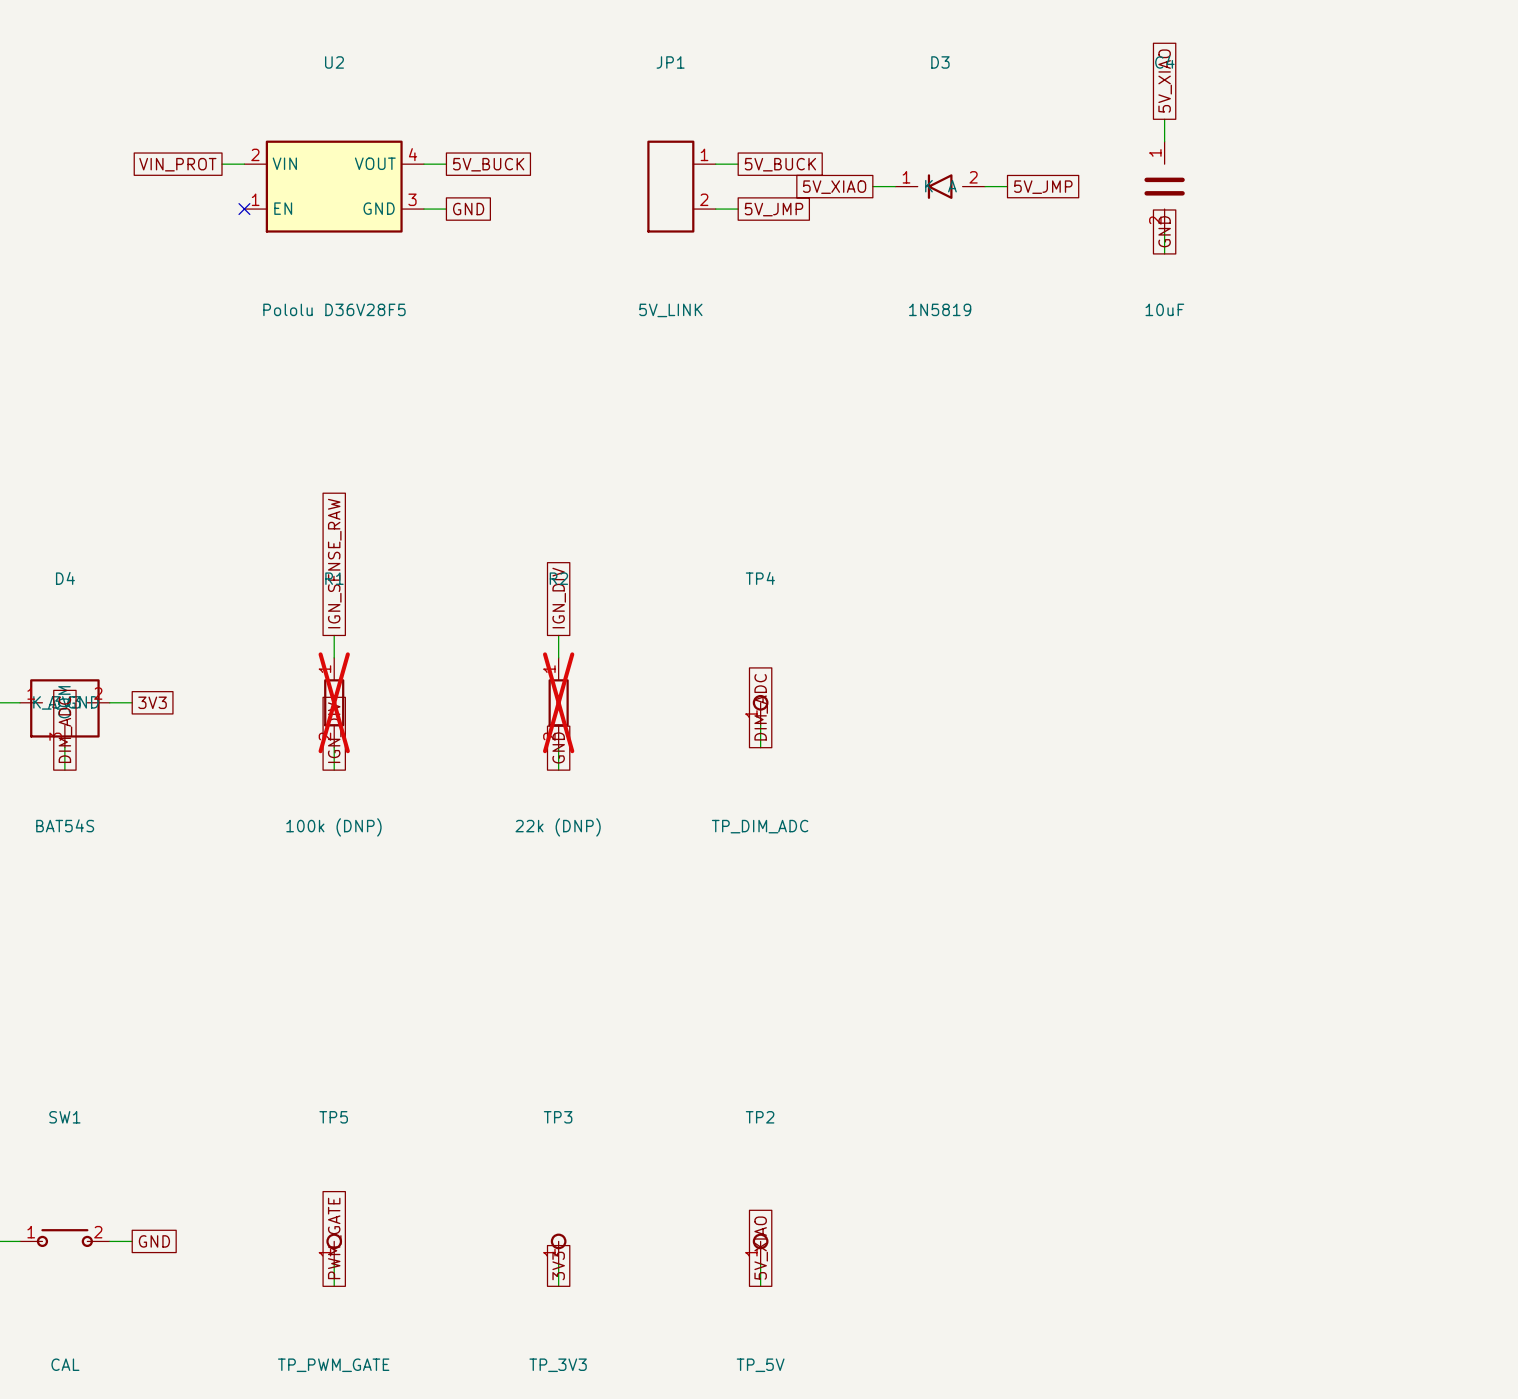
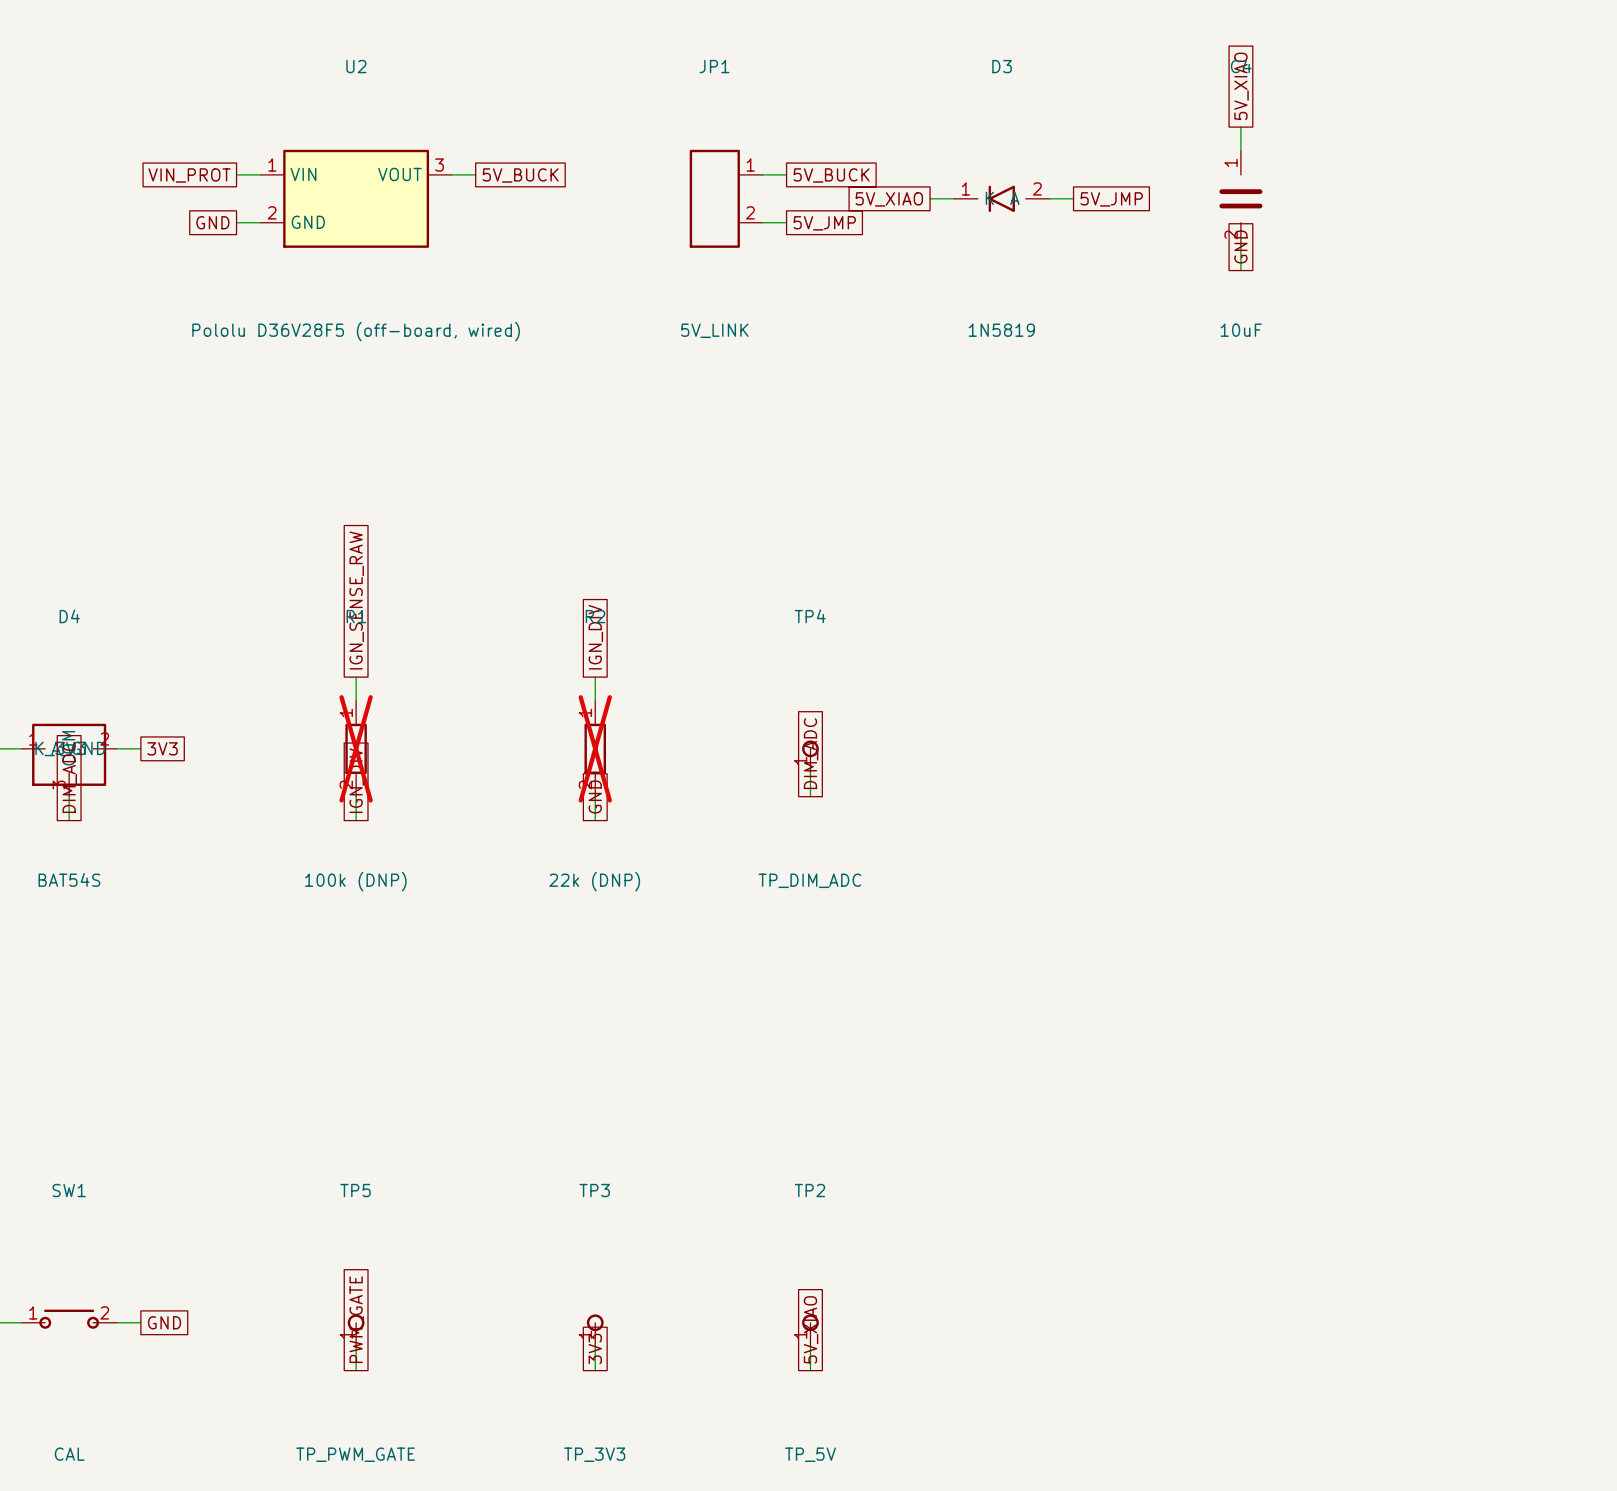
U2 symbol: [244, 140, 424, 233] -> [260, 149, 452, 248]
global label: none -> GND (212, 222)
no-connect mark: (244, 209) -> none
wire: (423, 209) (446, 209) -> (236, 222) (260, 222)
global label: GND (468, 209) -> none
U2 value: Pololu D36V28F5 (334, 309) -> Pololu D36V28F5 (off-board, wired) (356, 331)

